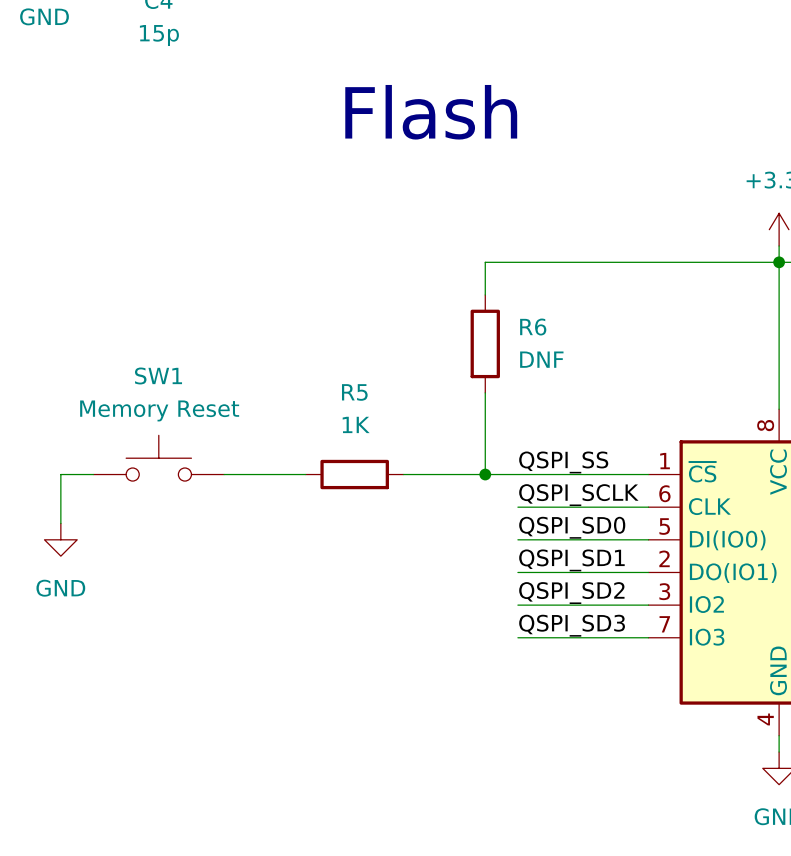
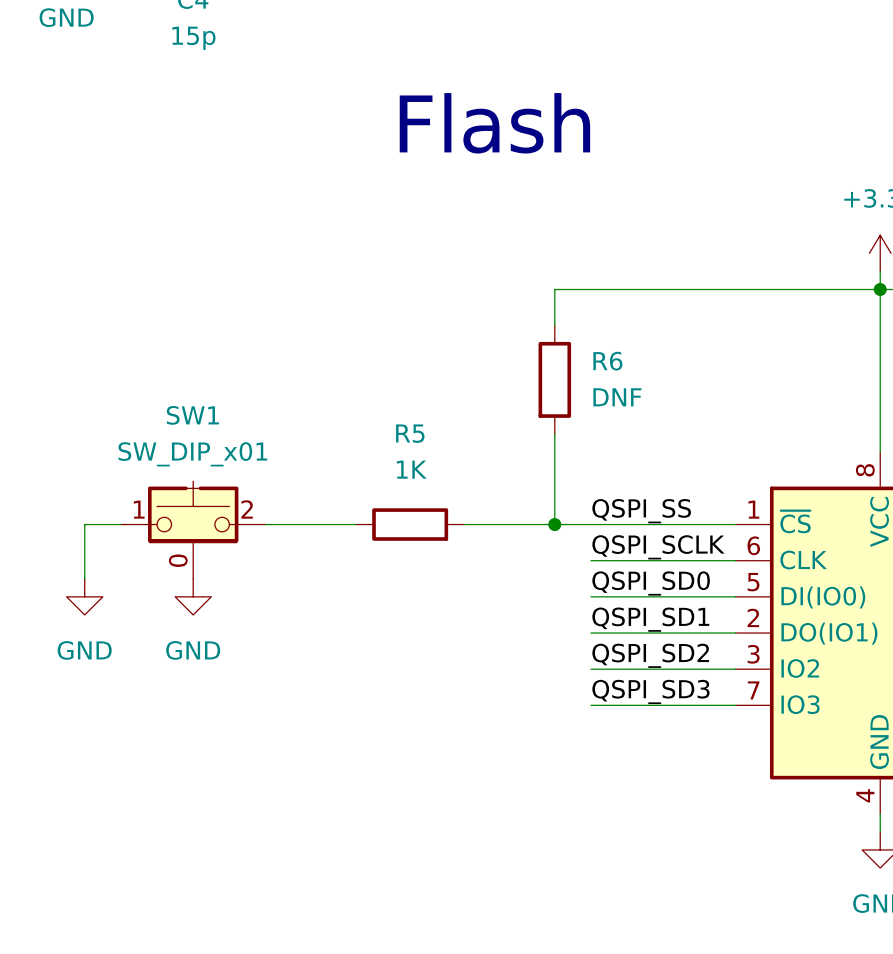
SW1 value: Memory Reset (159, 410) -> SW_DIP_x01 (192, 454)
SW1 symbol: [93, 435, 225, 482] -> [120, 481, 266, 579]
power symbol: none -> GND (193, 596)

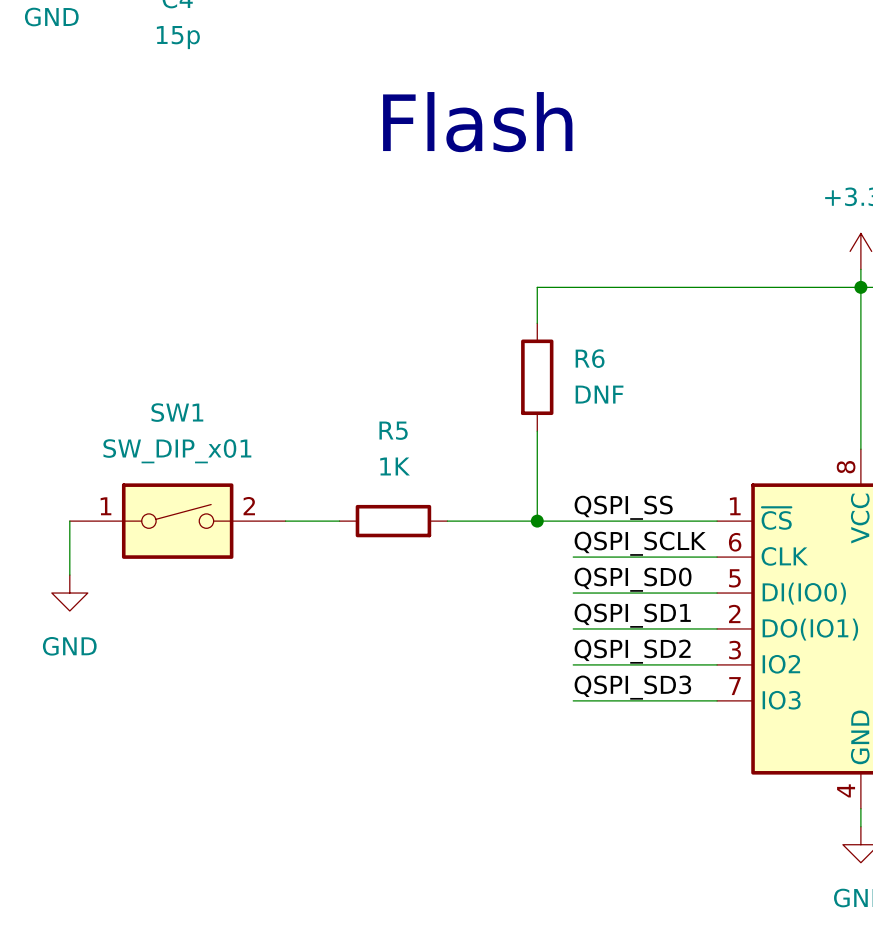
SW1 symbol: [120, 481, 266, 579] -> [69, 483, 286, 559]
power symbol: GND (193, 596) -> none

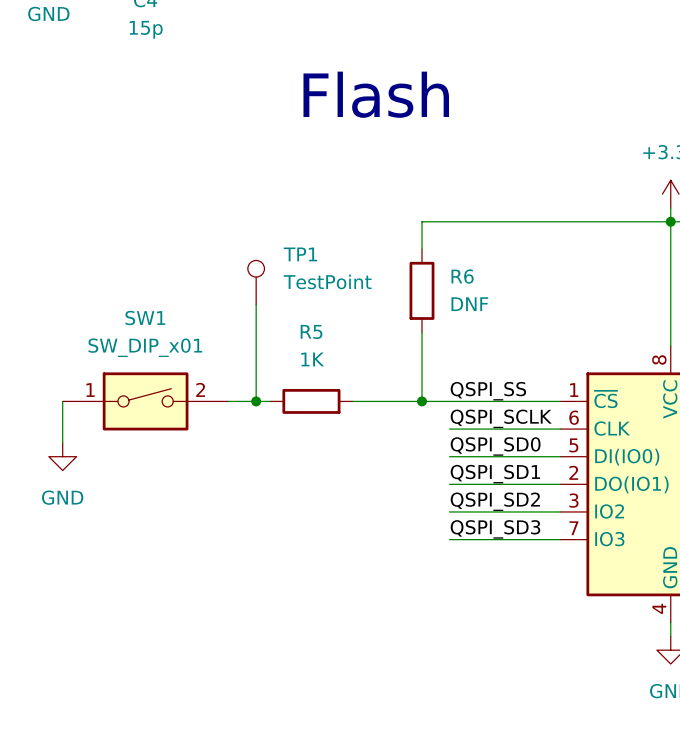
TP1: none -> TestPoint (256, 282)
wire: none -> (256, 304) (256, 401)
junction: none -> (256, 401)

